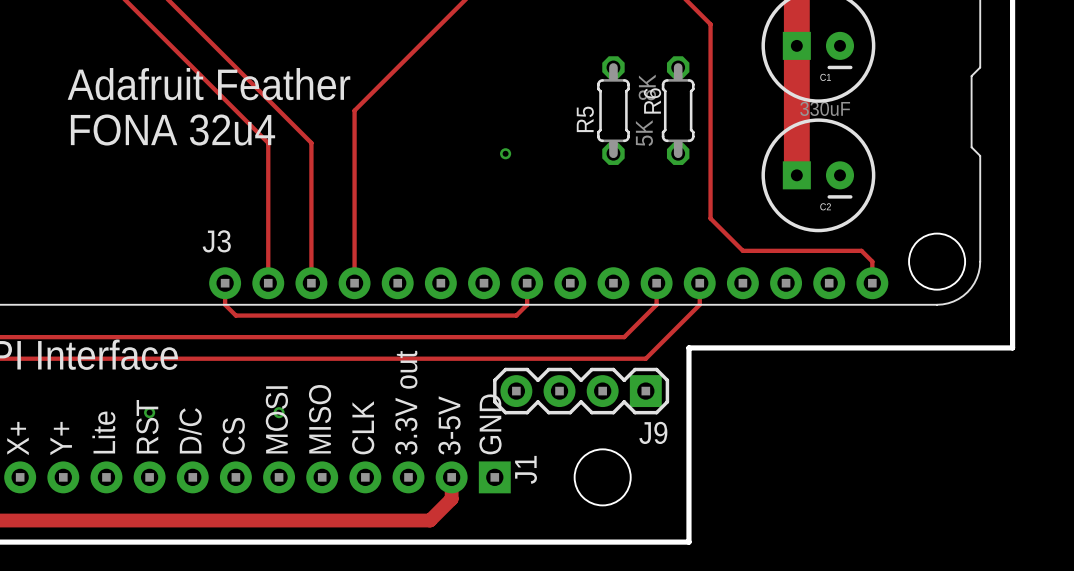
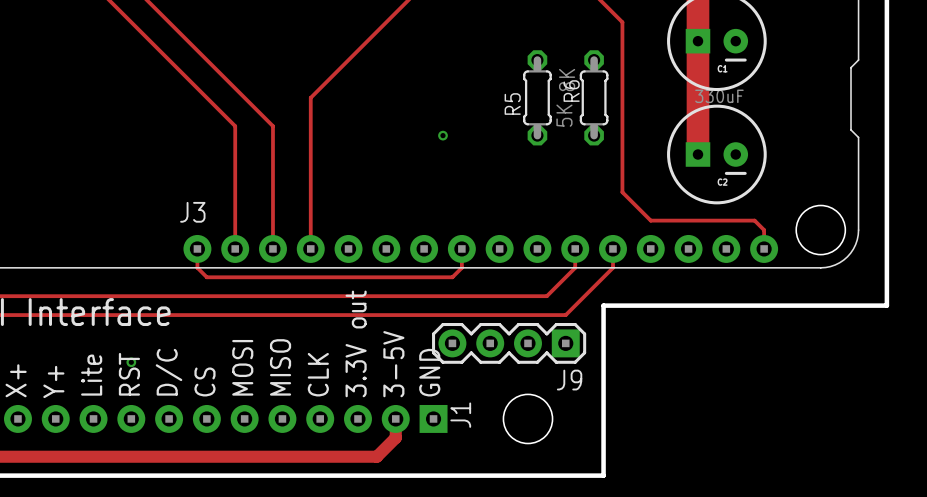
text: Adafruit Feather (209, 84) -> none
text: FONA 32u4 (172, 130) -> none
via: (279, 412) -> none

